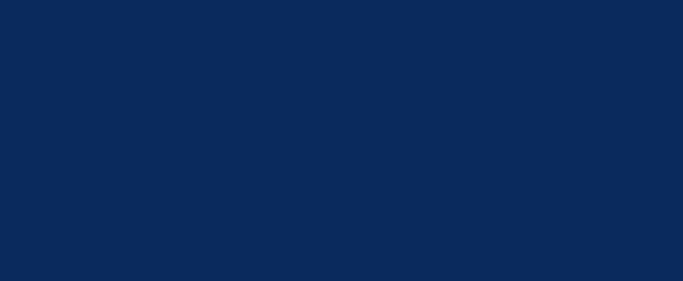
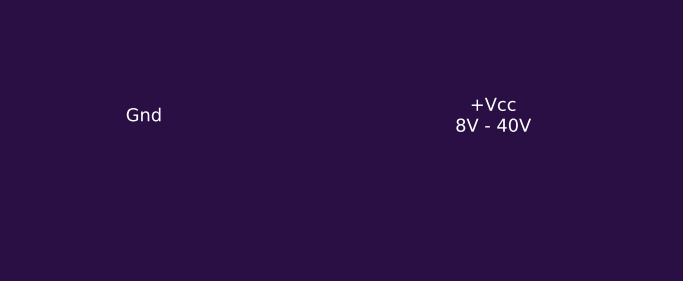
text: none -> +Vcc (493, 104)
text: none -> Gnd (143, 114)
text: none -> 8V - 40V (493, 125)

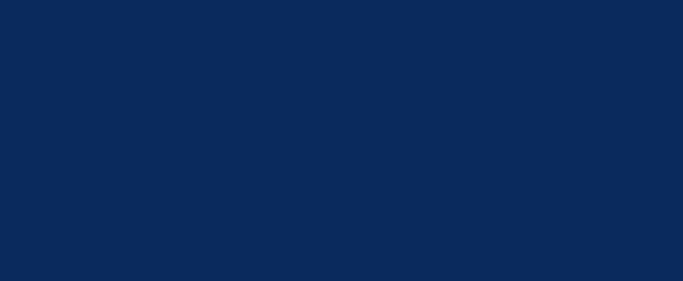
text: +Vcc (493, 104) -> none
text: Gnd (143, 114) -> none
text: 8V - 40V (493, 125) -> none

